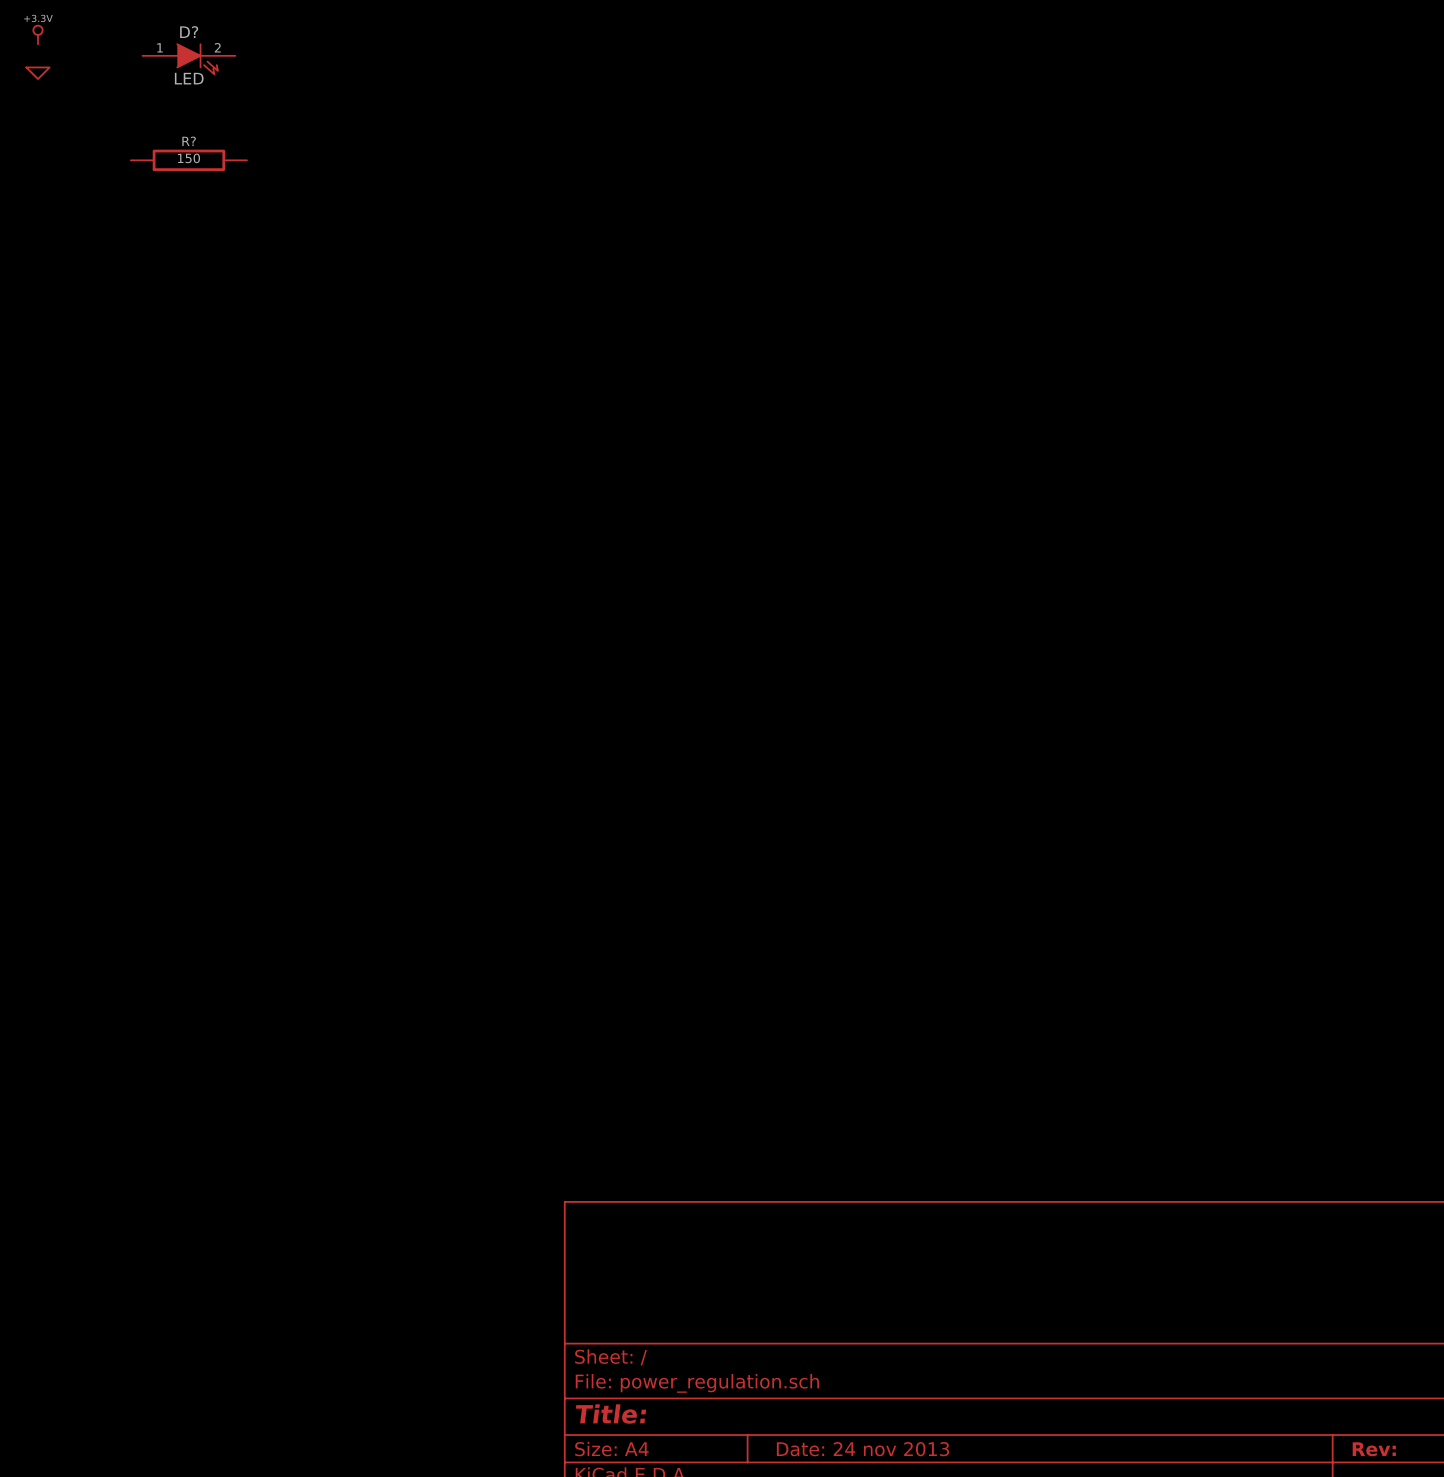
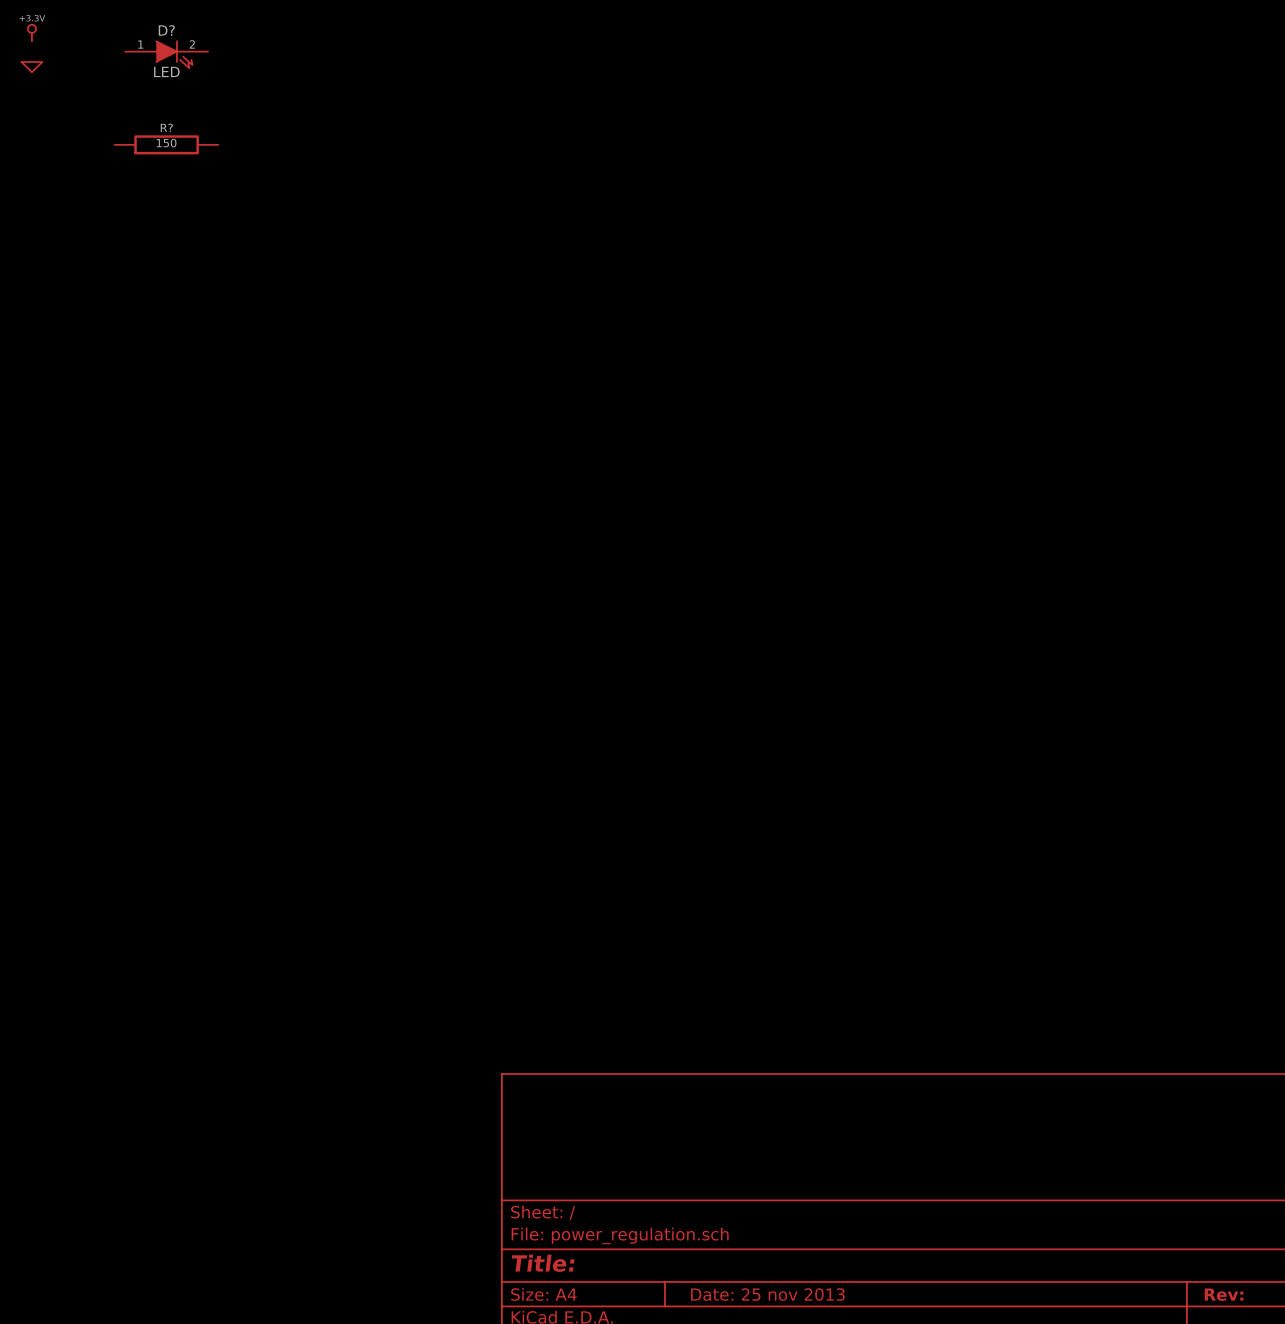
title block: Date: 24 nov 2013 (862, 1449) -> Date: 25 nov 2013 (767, 1294)

